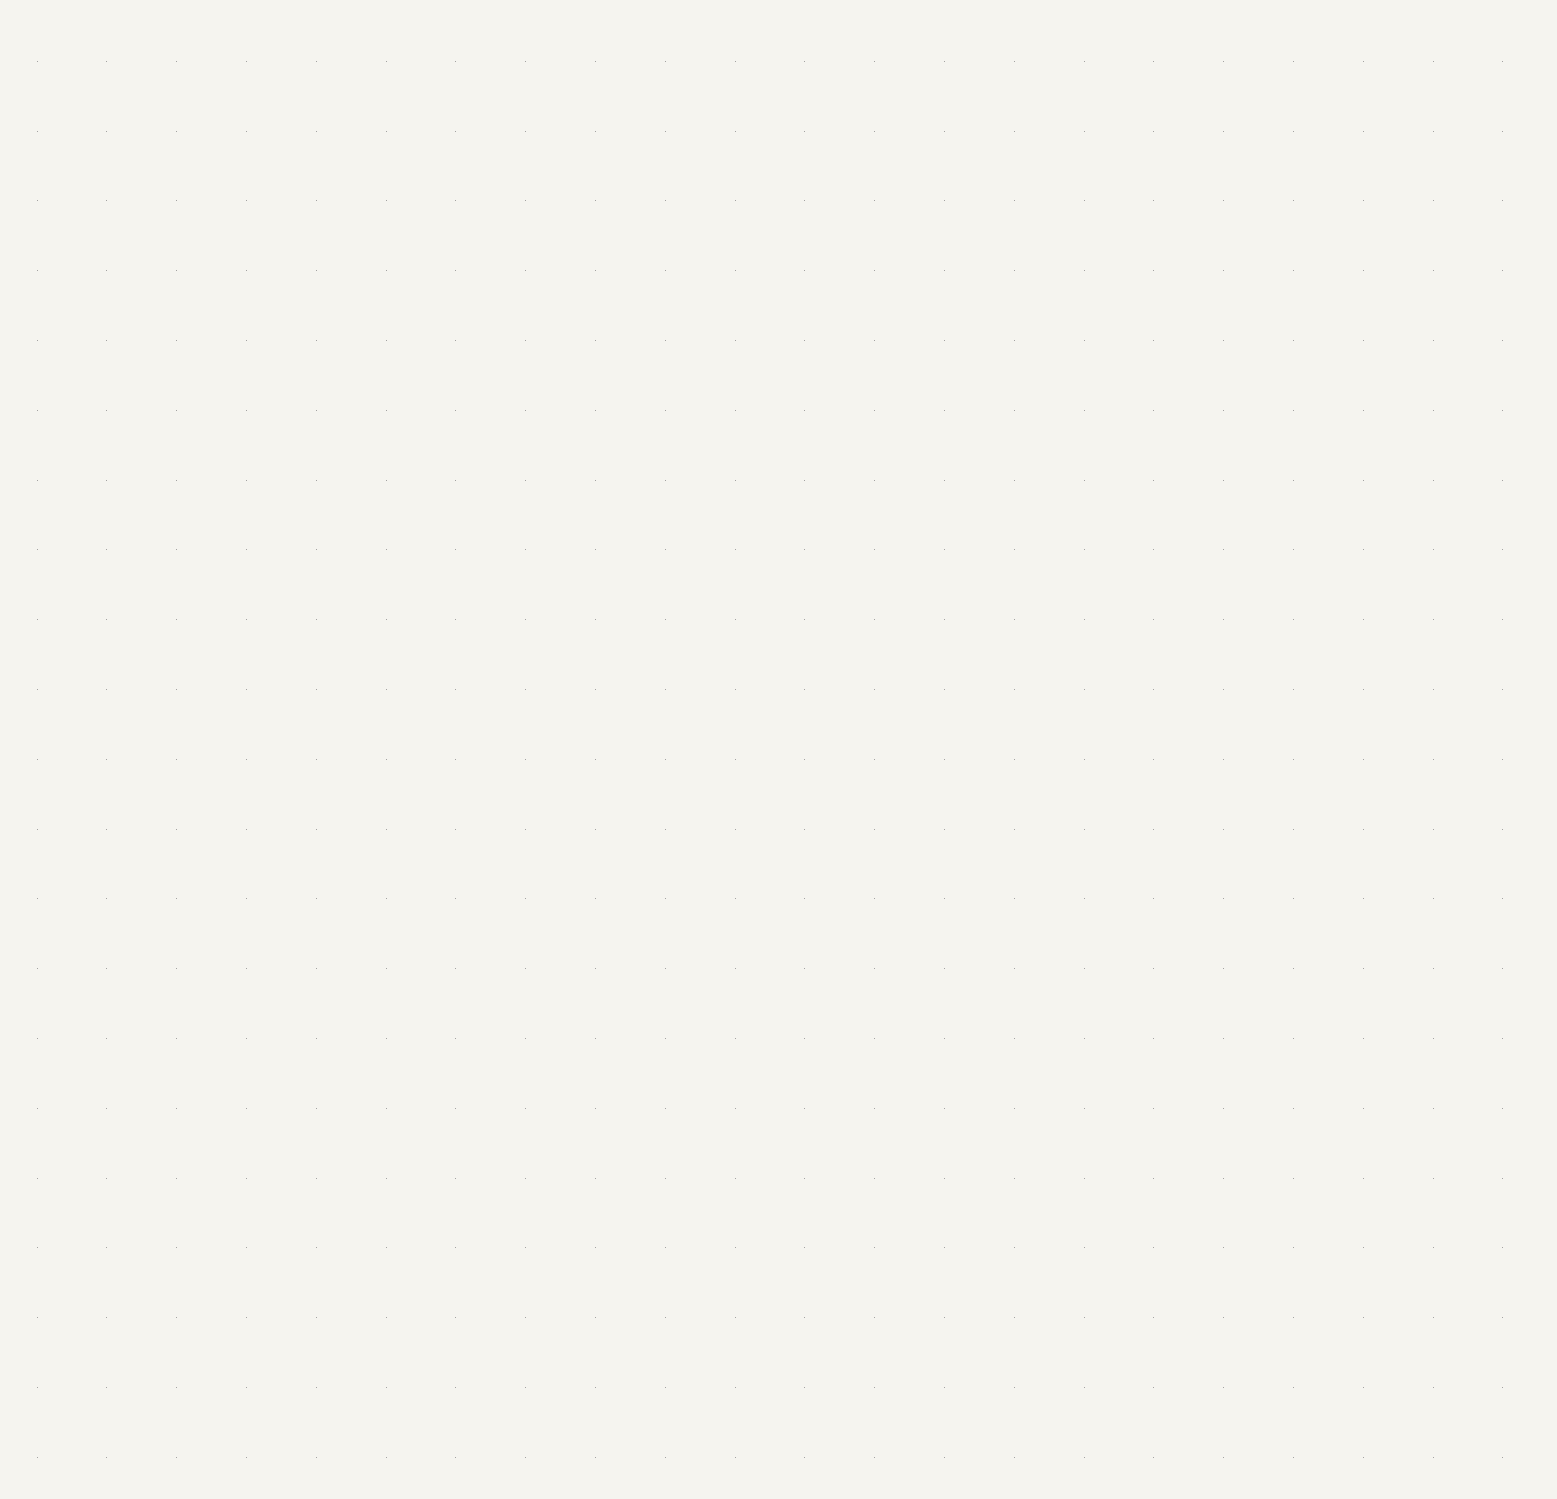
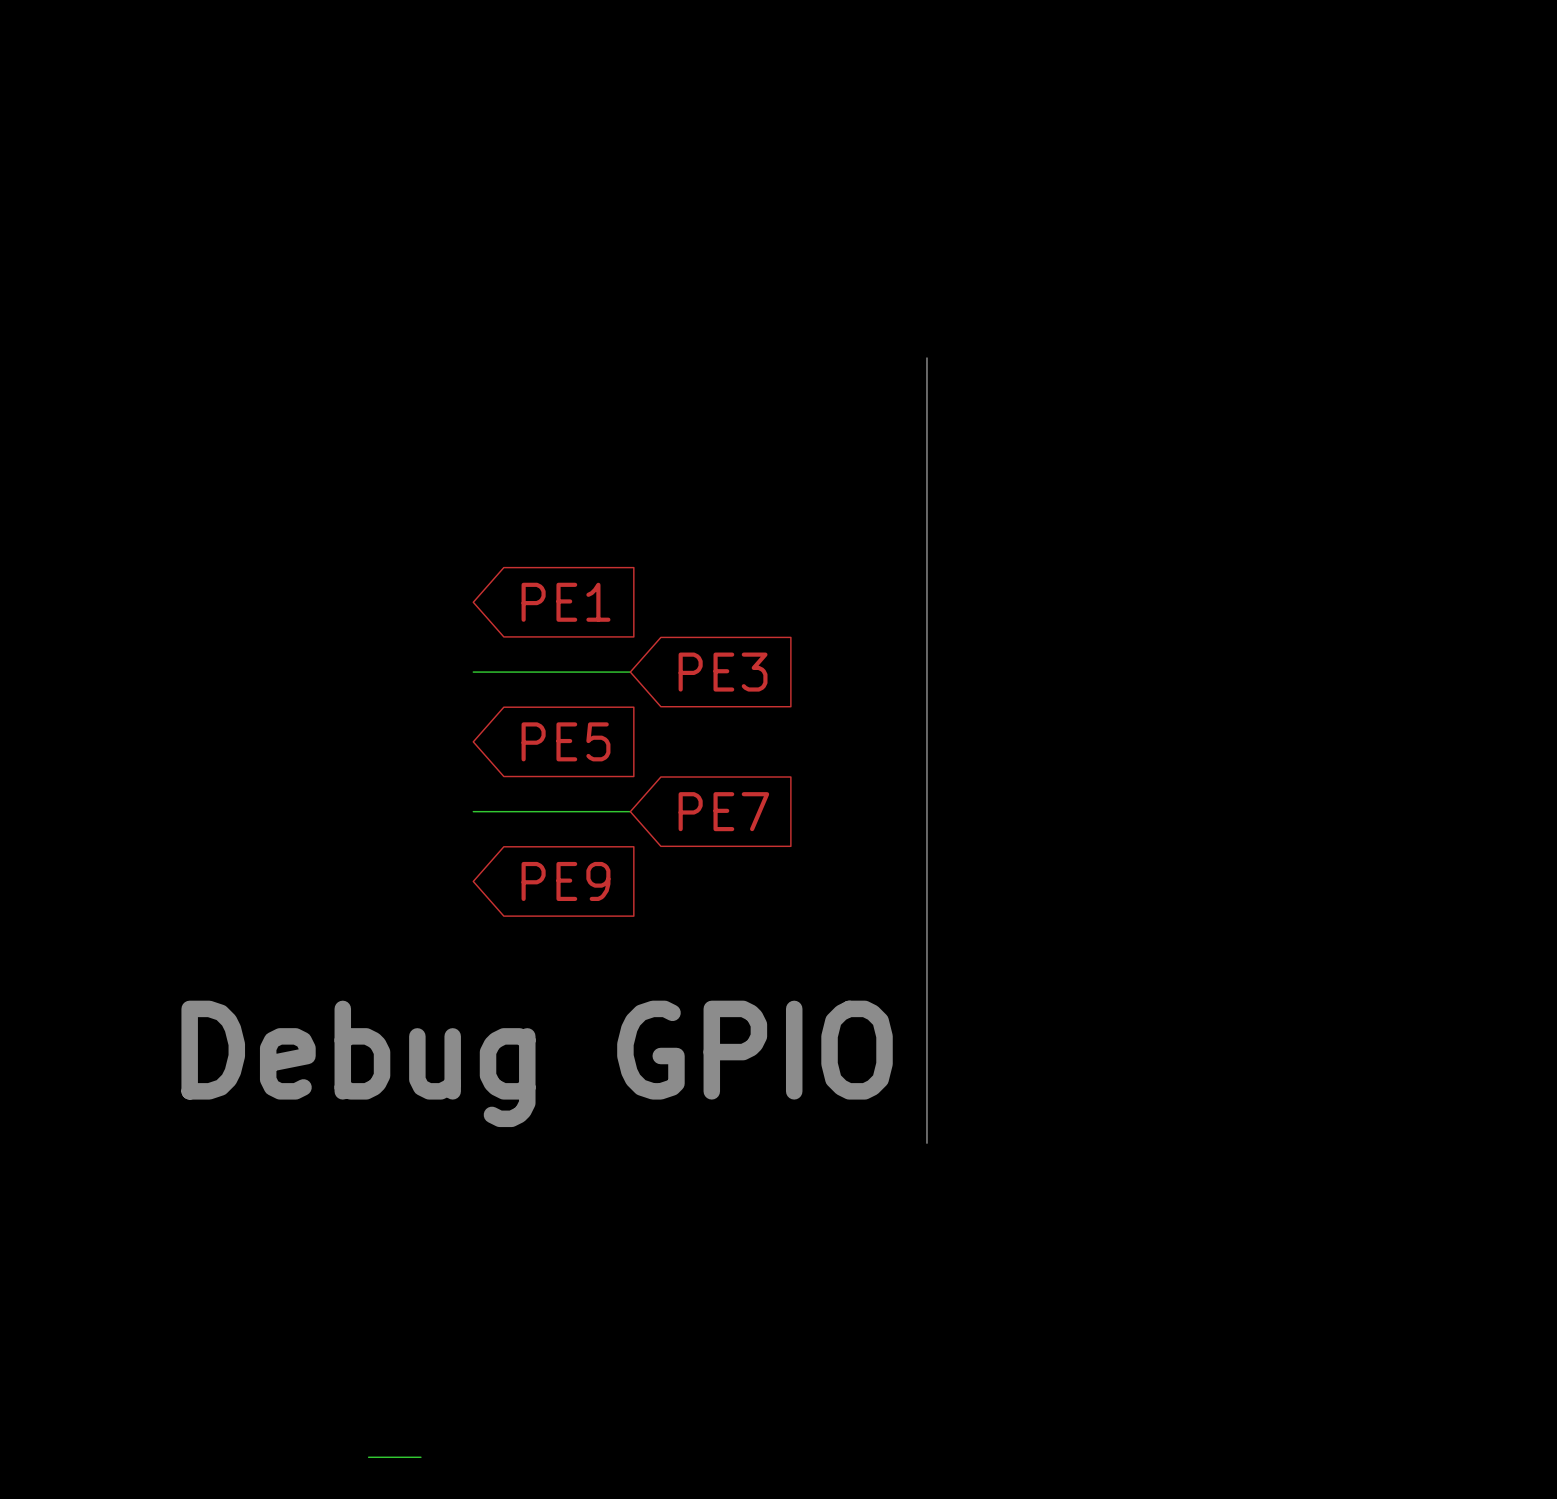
line: none -> (926, 357) (926, 1143)
global label: none -> PE1 (566, 602)
wire: none -> (473, 672) (630, 672)
global label: none -> PE3 (723, 672)
global label: none -> PE5 (566, 741)
wire: none -> (473, 811) (630, 811)
global label: none -> PE7 (723, 811)
global label: none -> PE9 (566, 881)
text: none -> Debug GPIO (537, 1063)
wire: none -> (368, 1457) (420, 1457)

